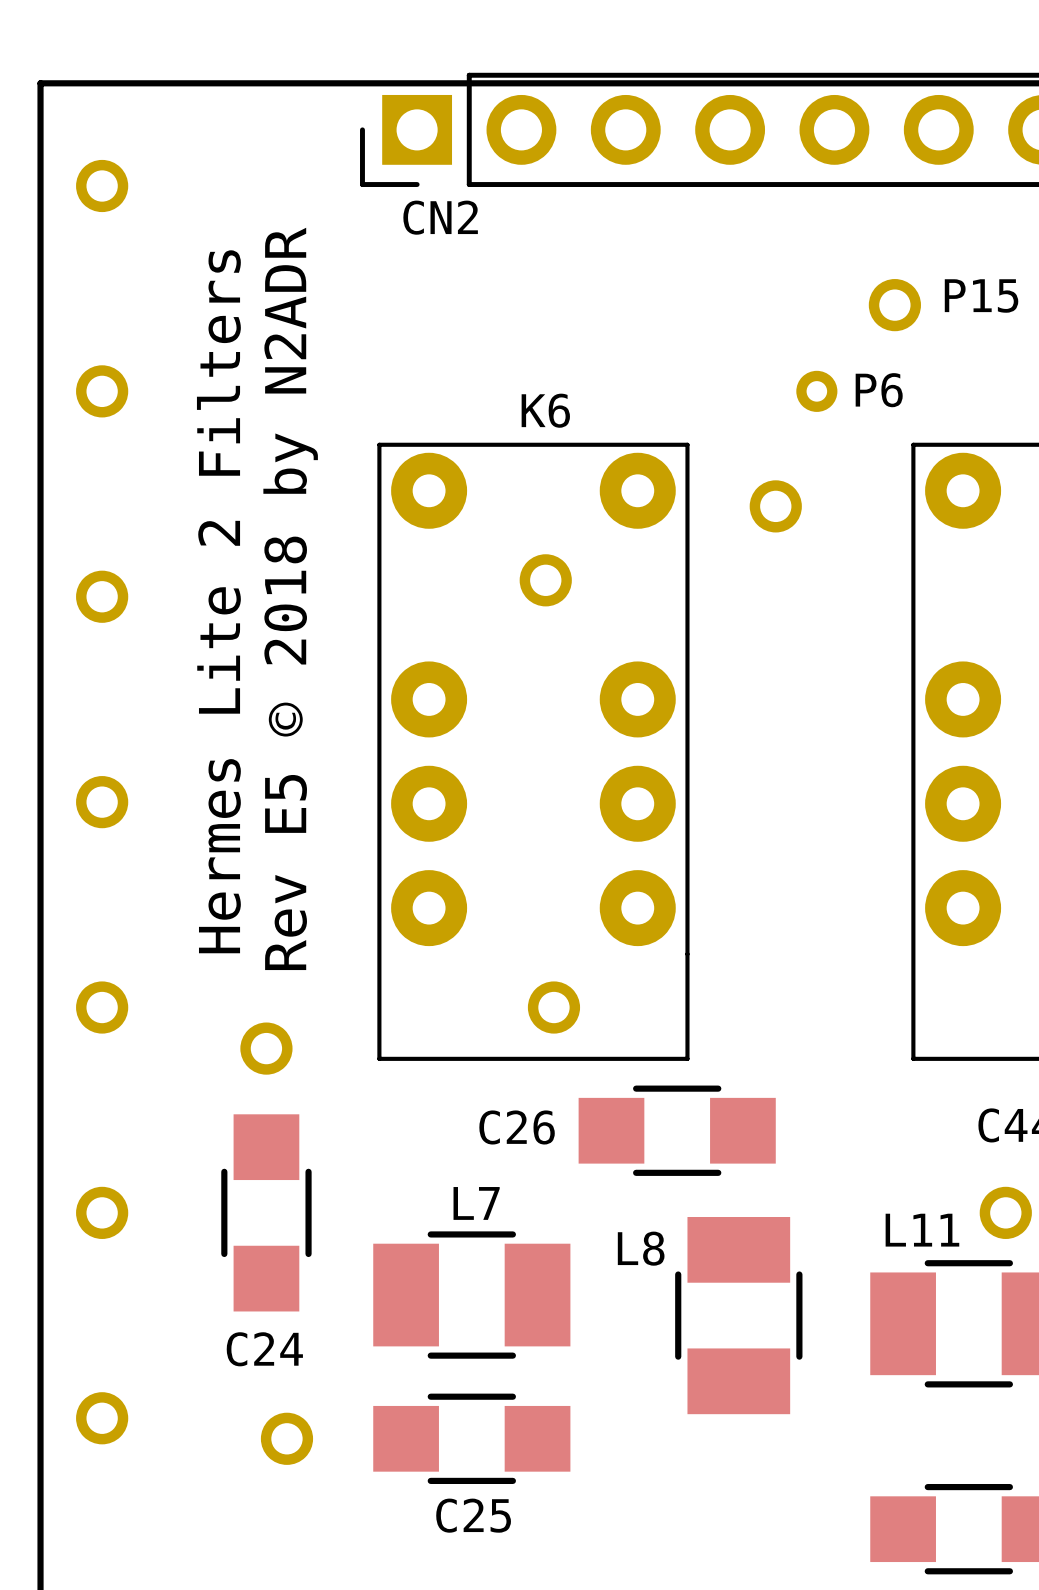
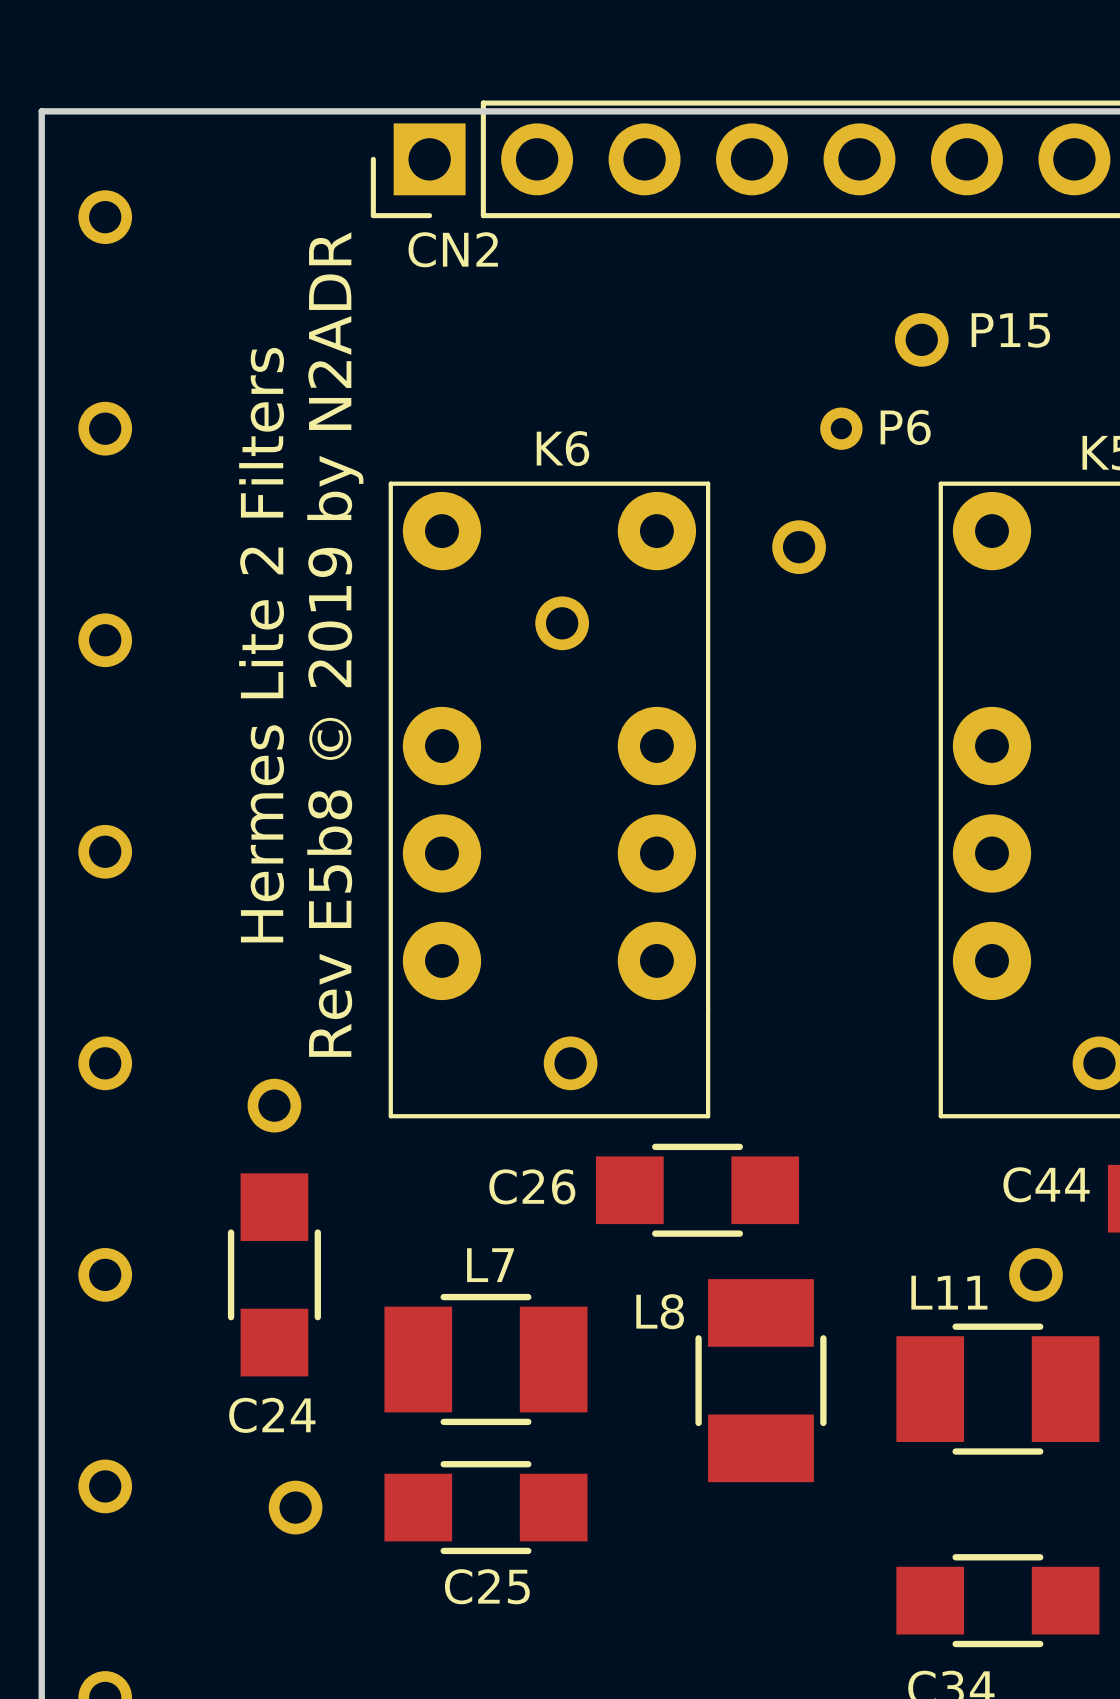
text: Rev E5 © 2018 by N2ADR (290, 598) -> Rev E5b8 © 2019 by N2ADR (335, 644)
text position: Hermes Lite 2 Filters (218, 601) -> Hermes Lite 2 Filters (261, 645)

